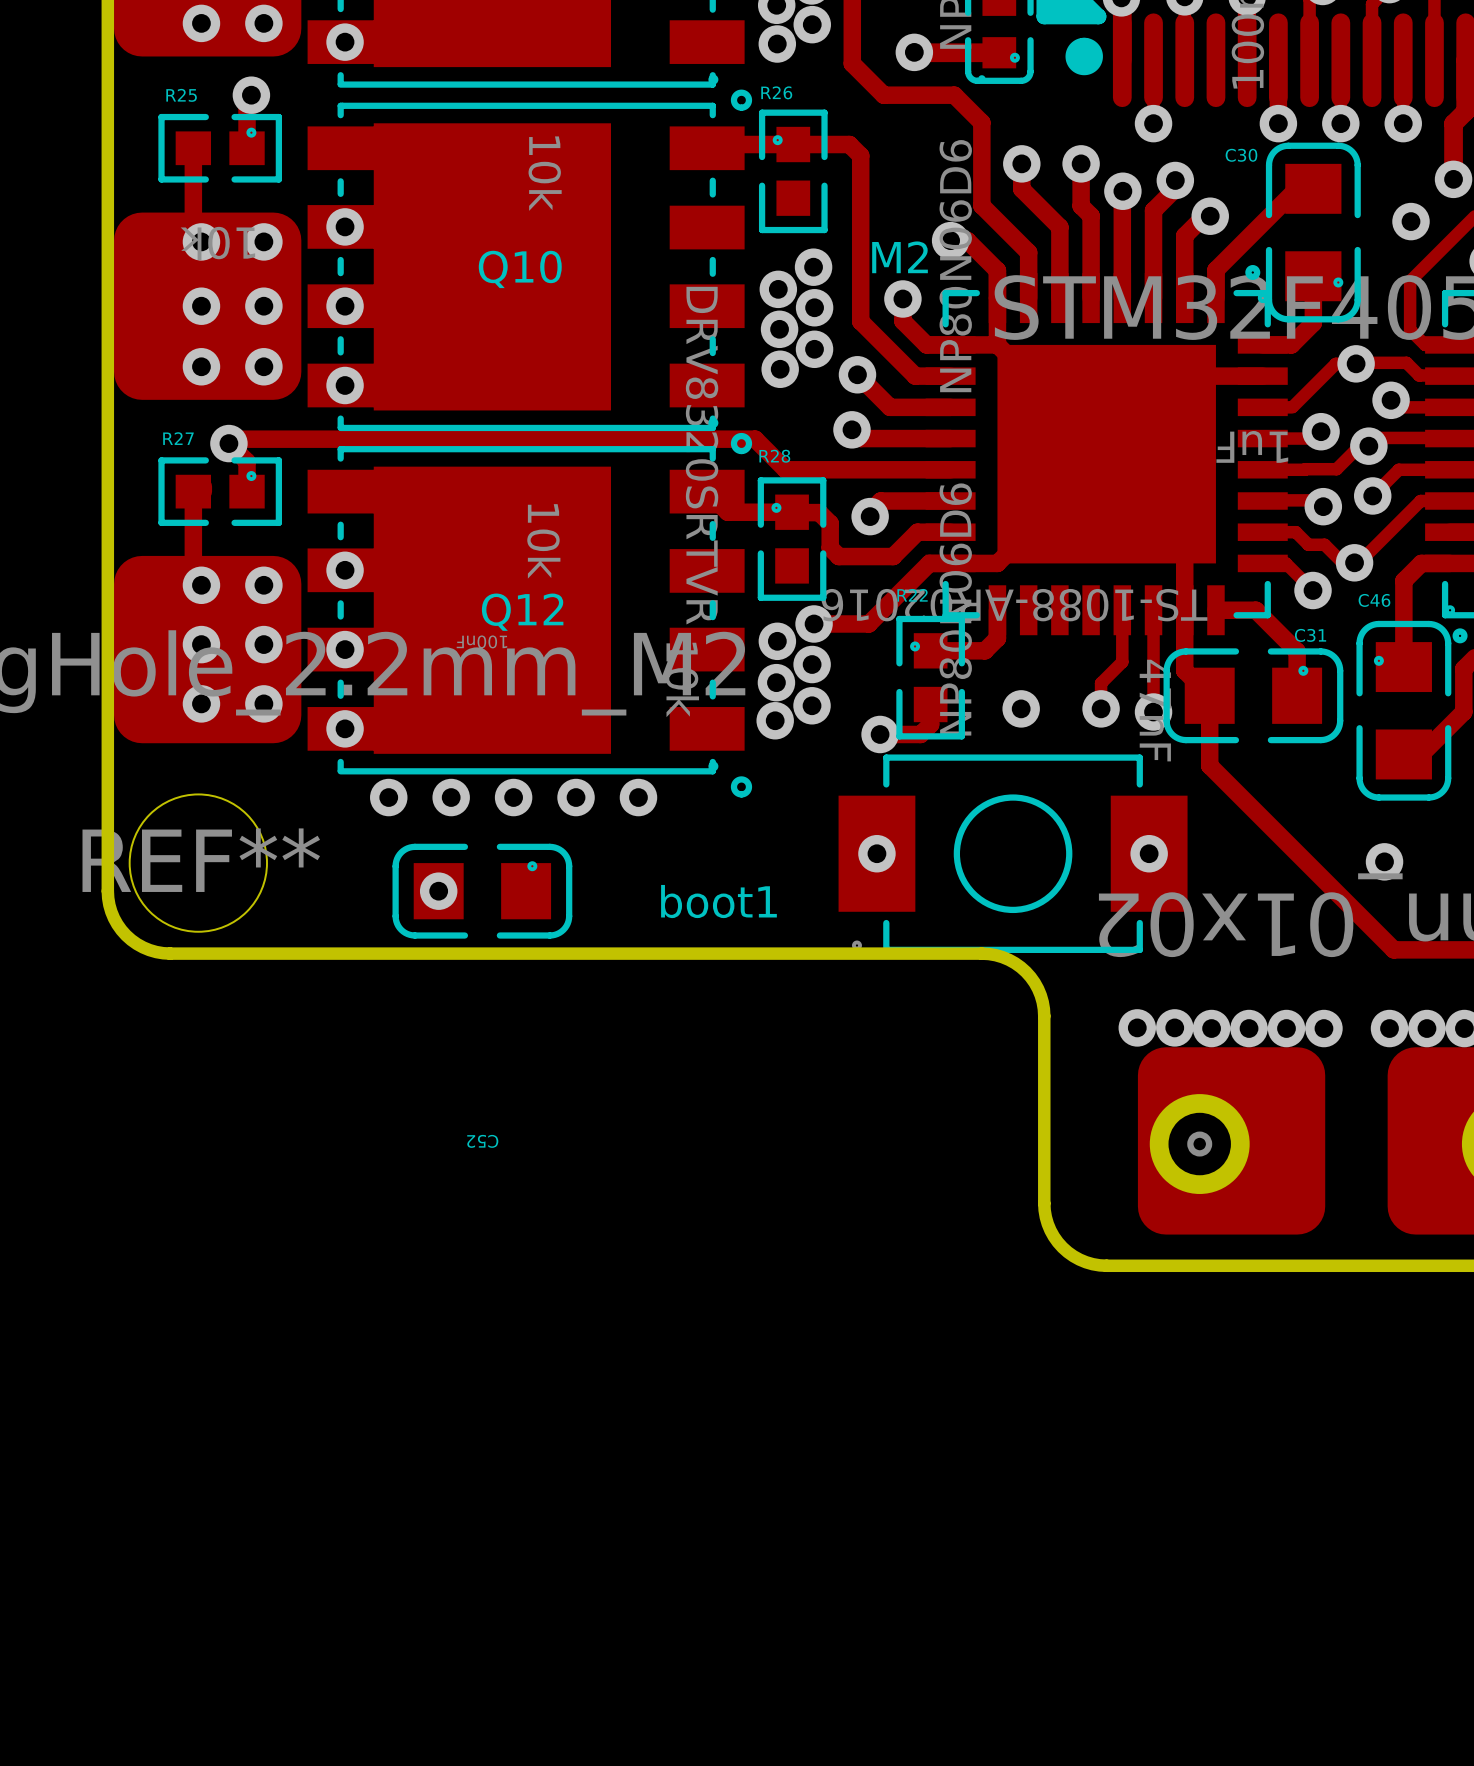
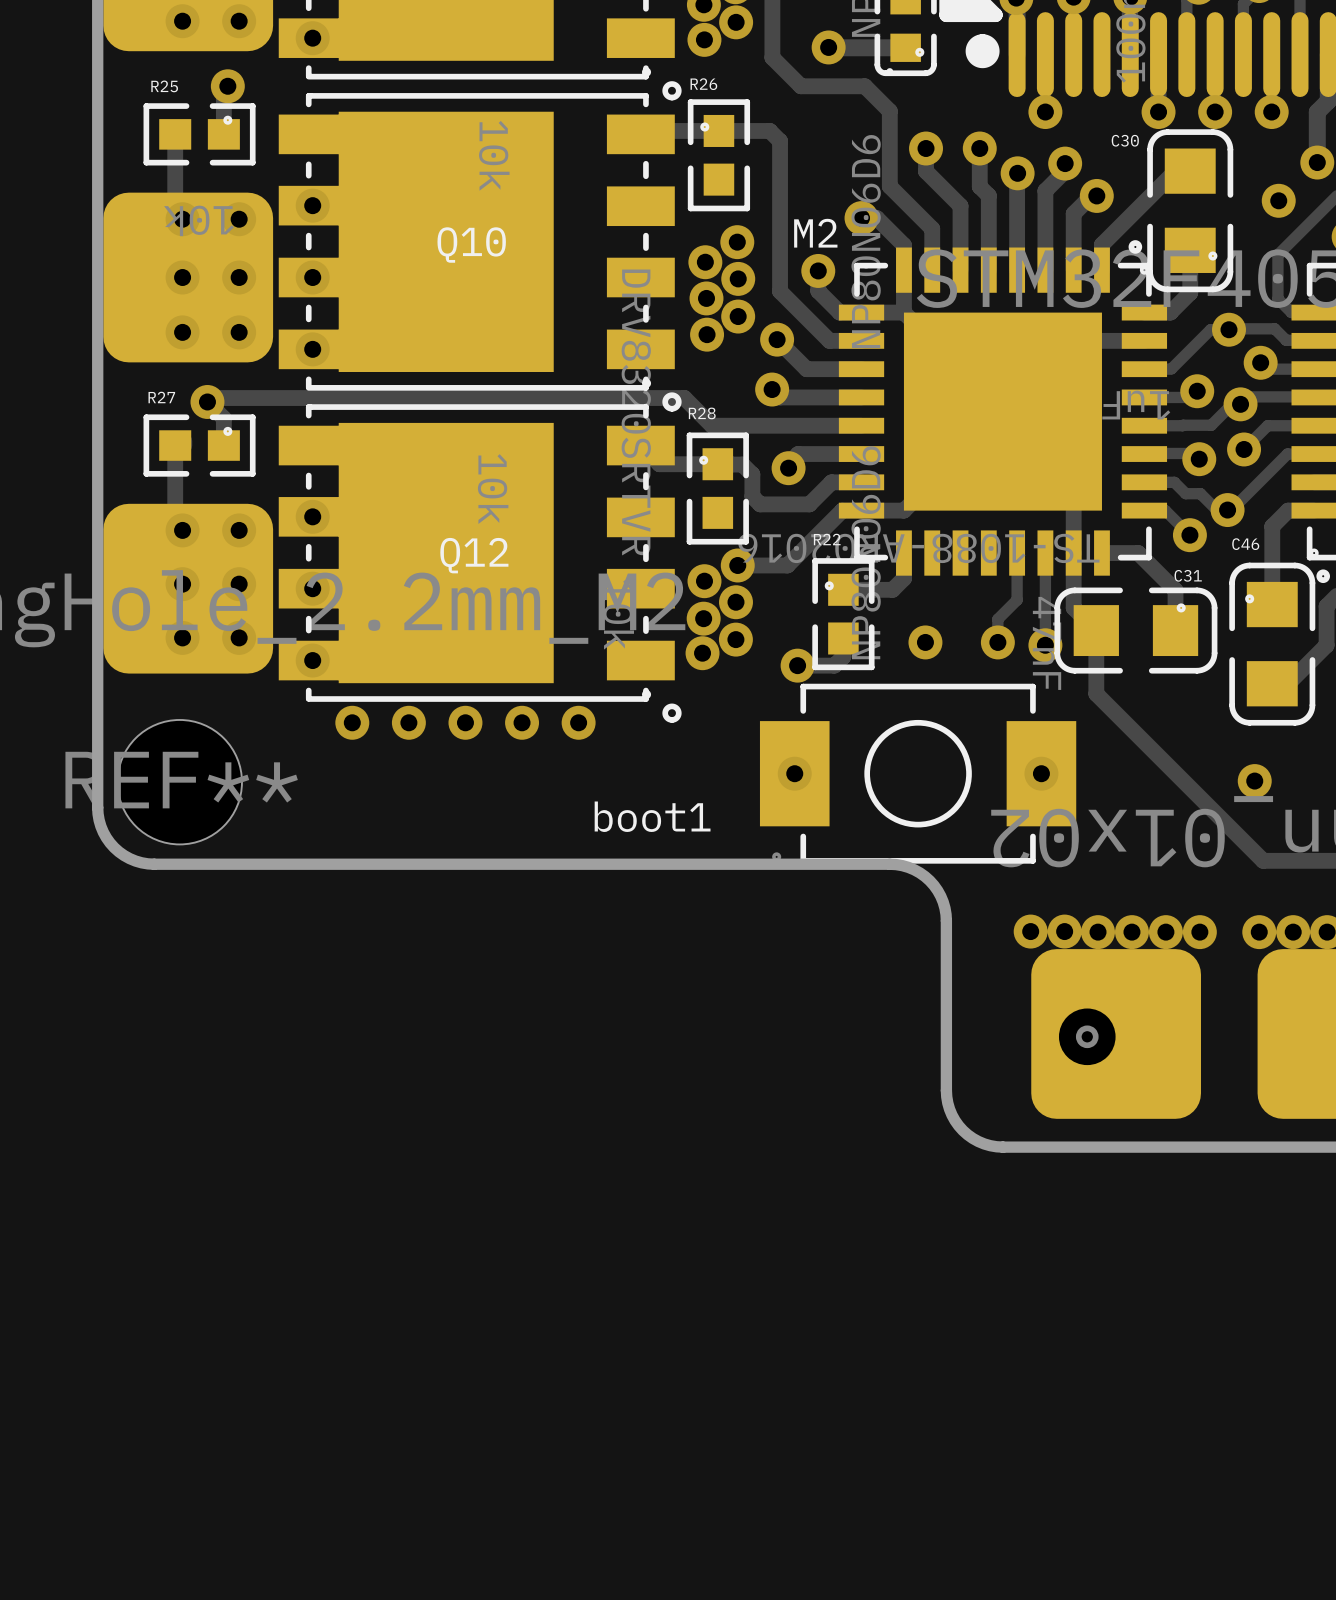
via: (438, 891) -> none
C52: 100nF (482, 891) -> none

